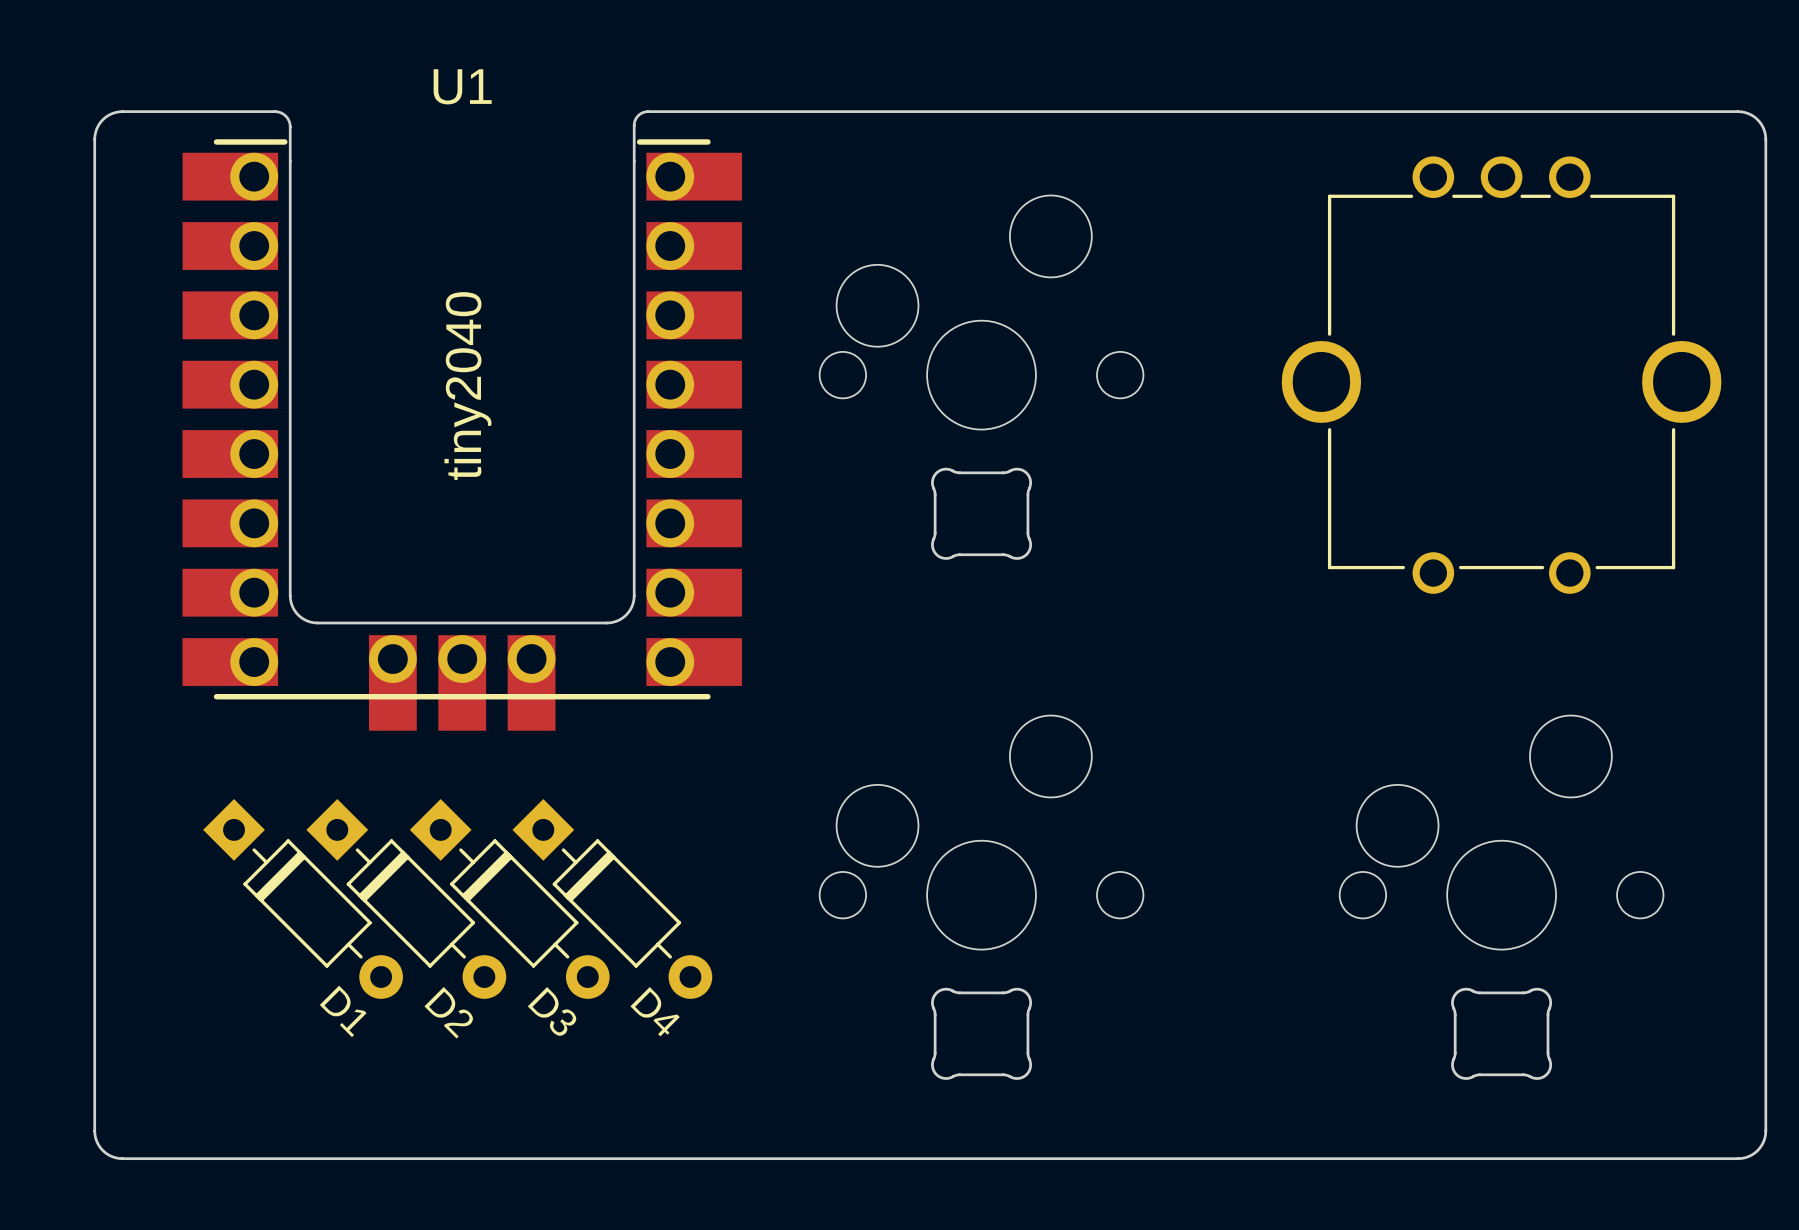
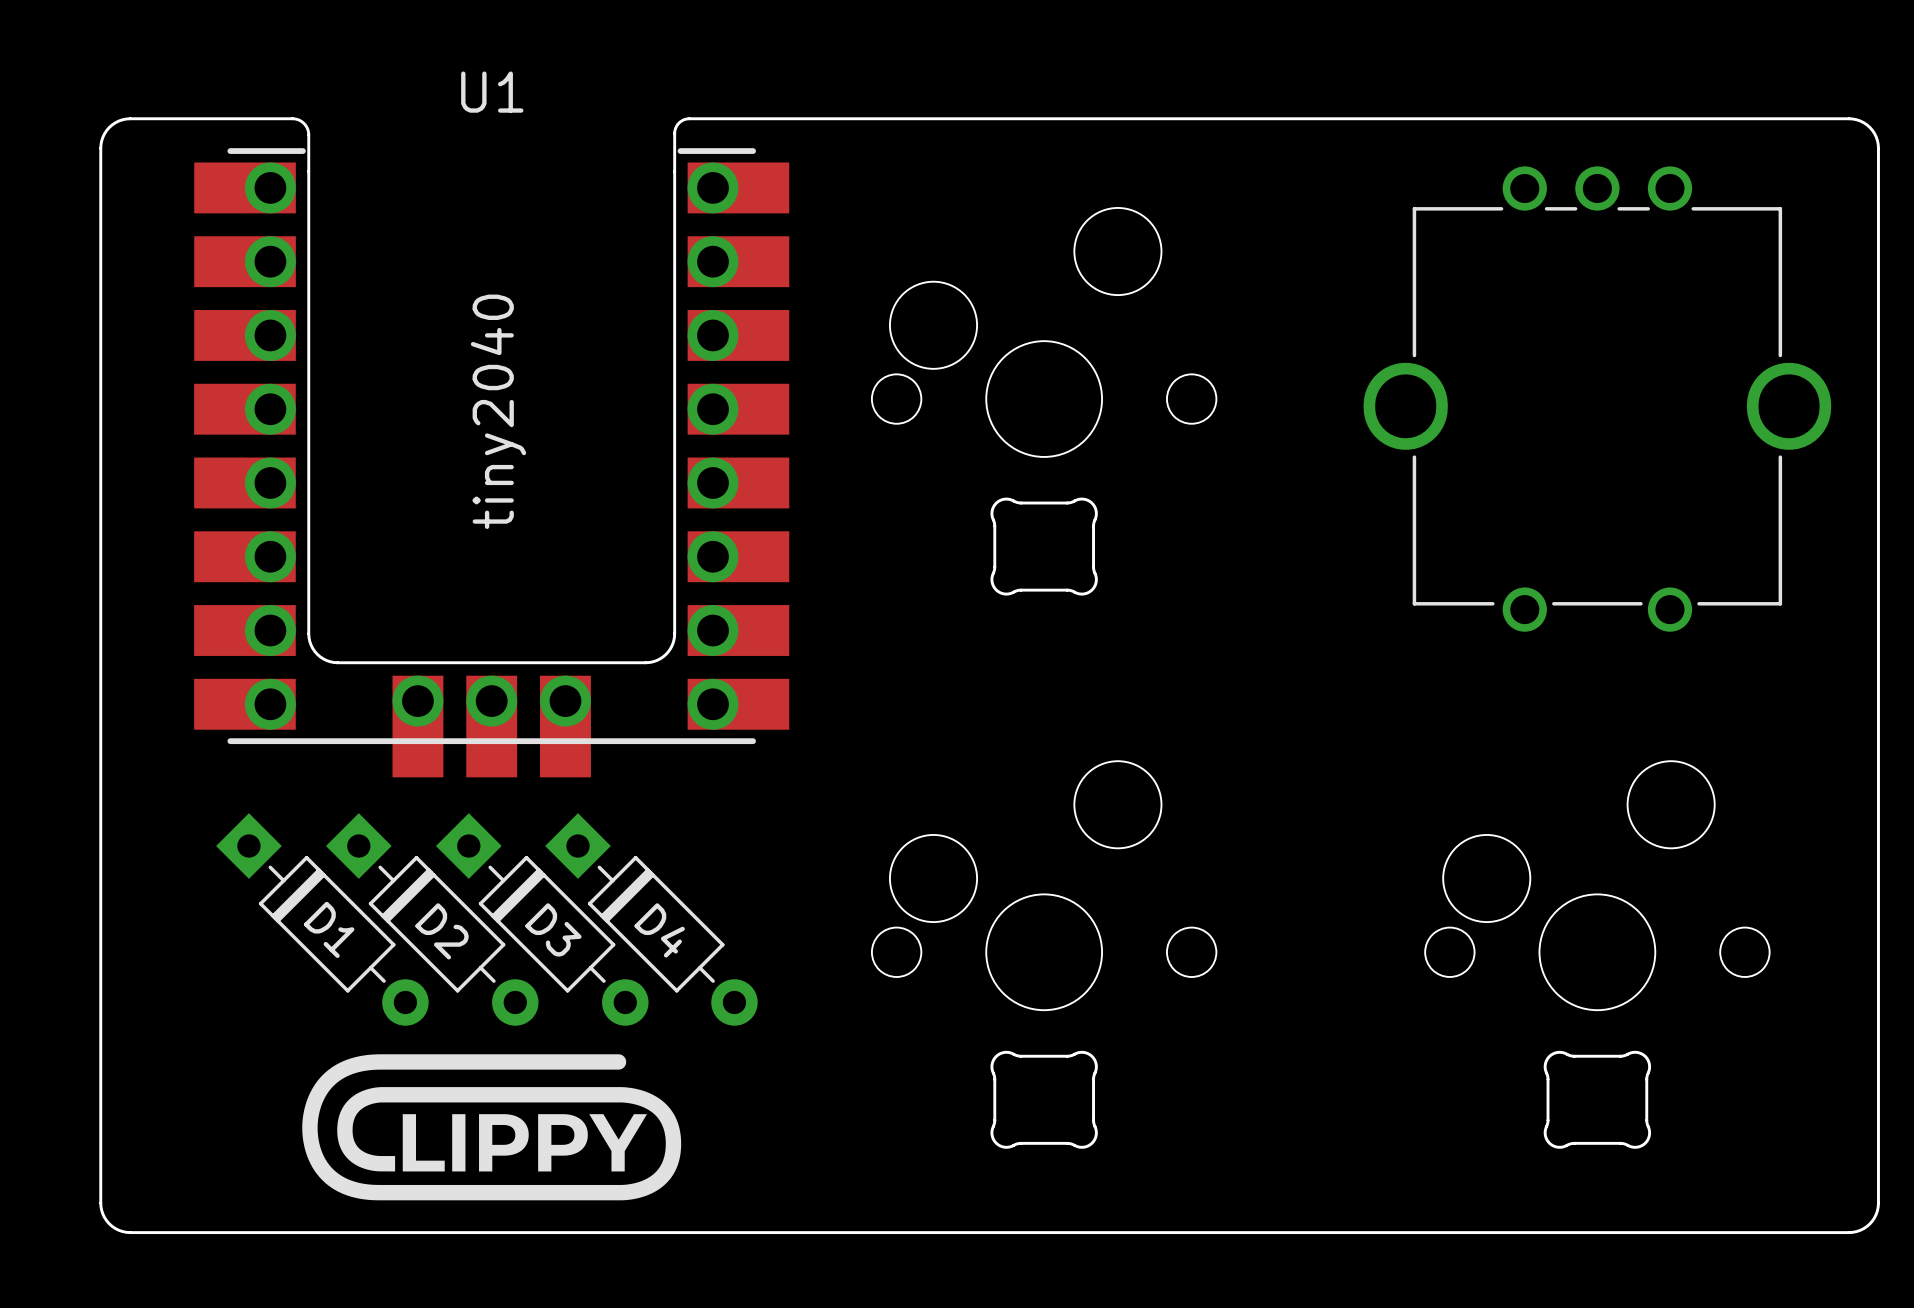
D1 position: (303, 898) -> (322, 919)
D2 position: (406, 898) -> (432, 919)
D3 position: (509, 898) -> (542, 919)
D4 position: (612, 898) -> (651, 919)
drawing: none -> [302, 1054, 682, 1201]
D1 name position: D1 (343, 1011) -> D1 (329, 929)
D3 name position: D3 (552, 1011) -> D3 (553, 929)
D4 name position: D4 (655, 1011) -> D4 (659, 930)
D2 name position: D2 (448, 1012) -> D2 (442, 931)

